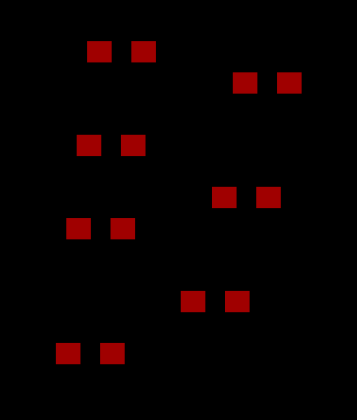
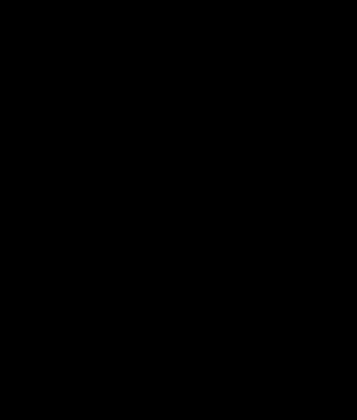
part: (121, 51) -> none
part: (267, 82) -> none
part: (111, 145) -> none
part: (246, 197) -> none
part: (100, 228) -> none
part: (215, 301) -> none
part: (90, 353) -> none

